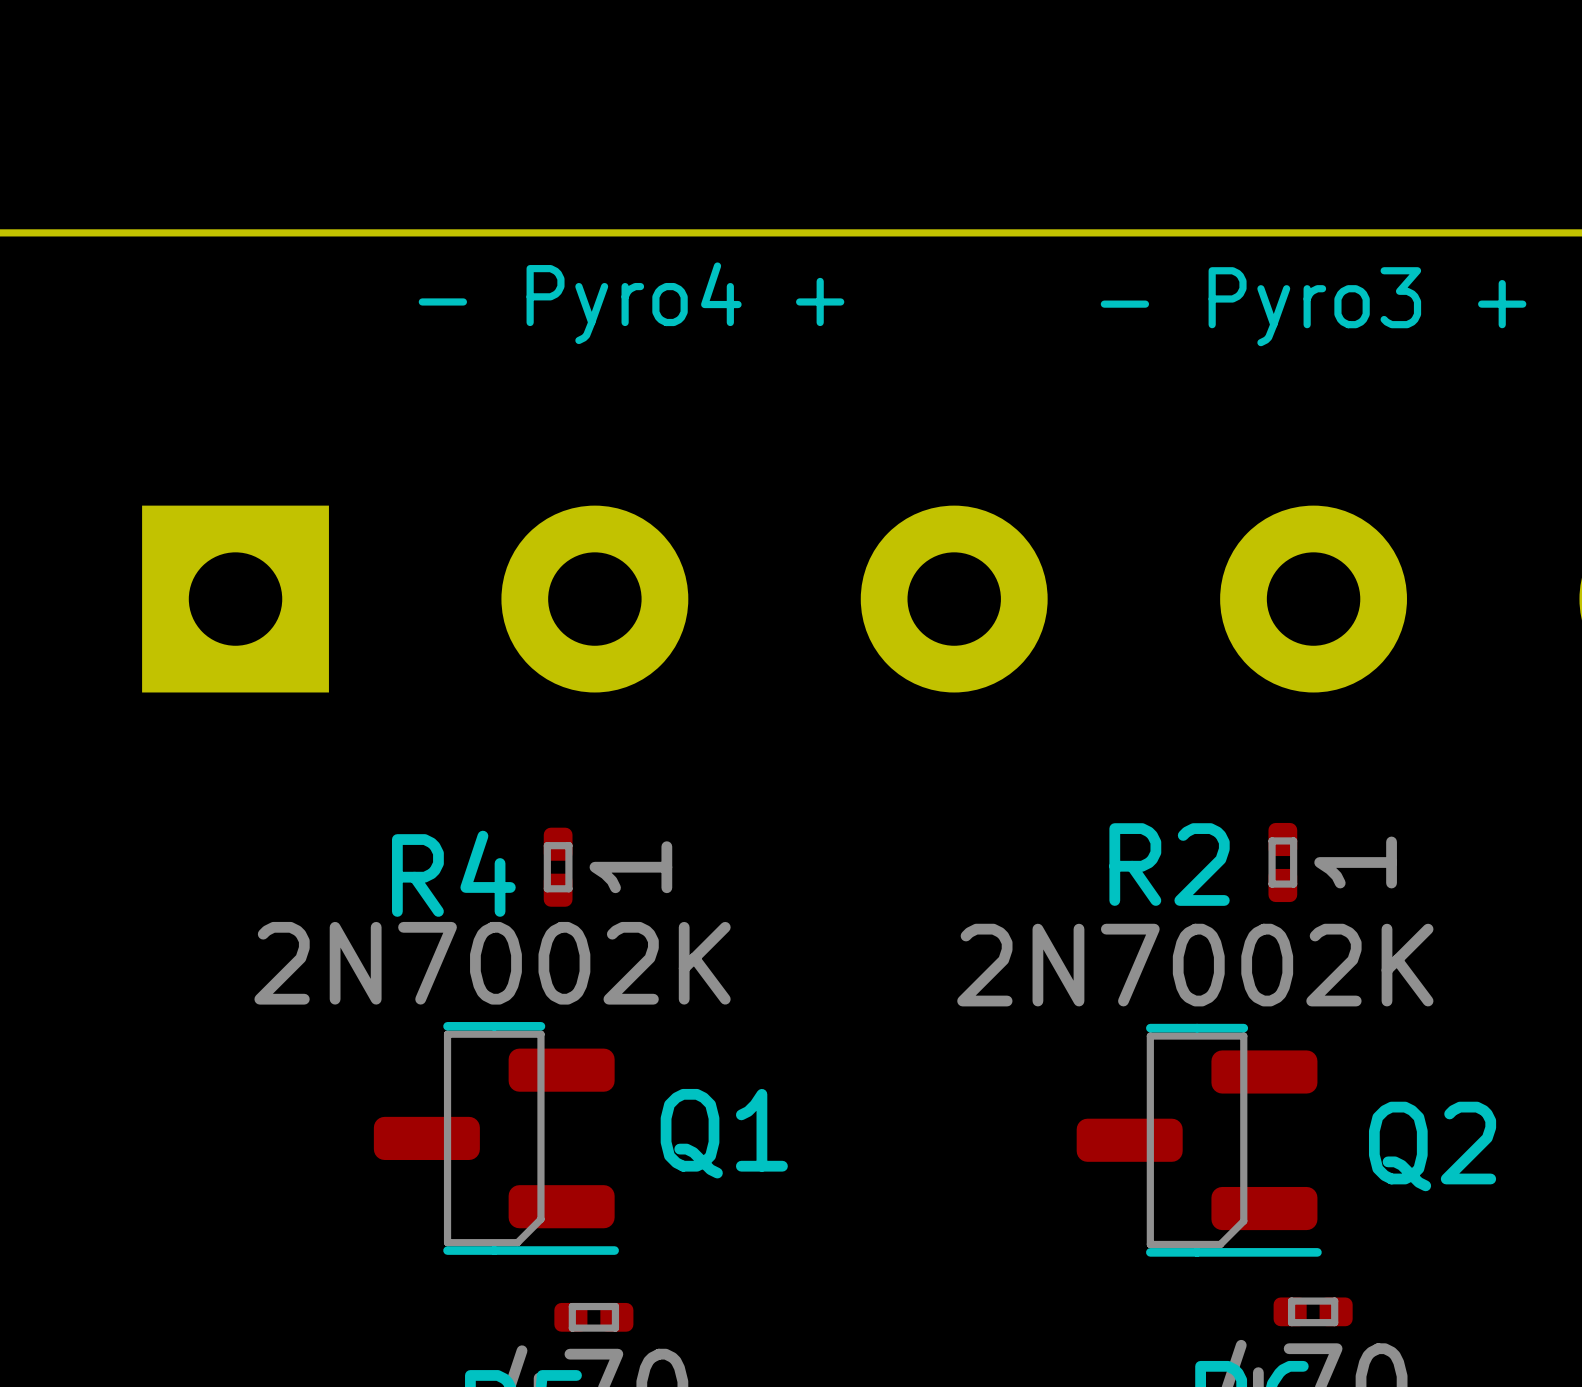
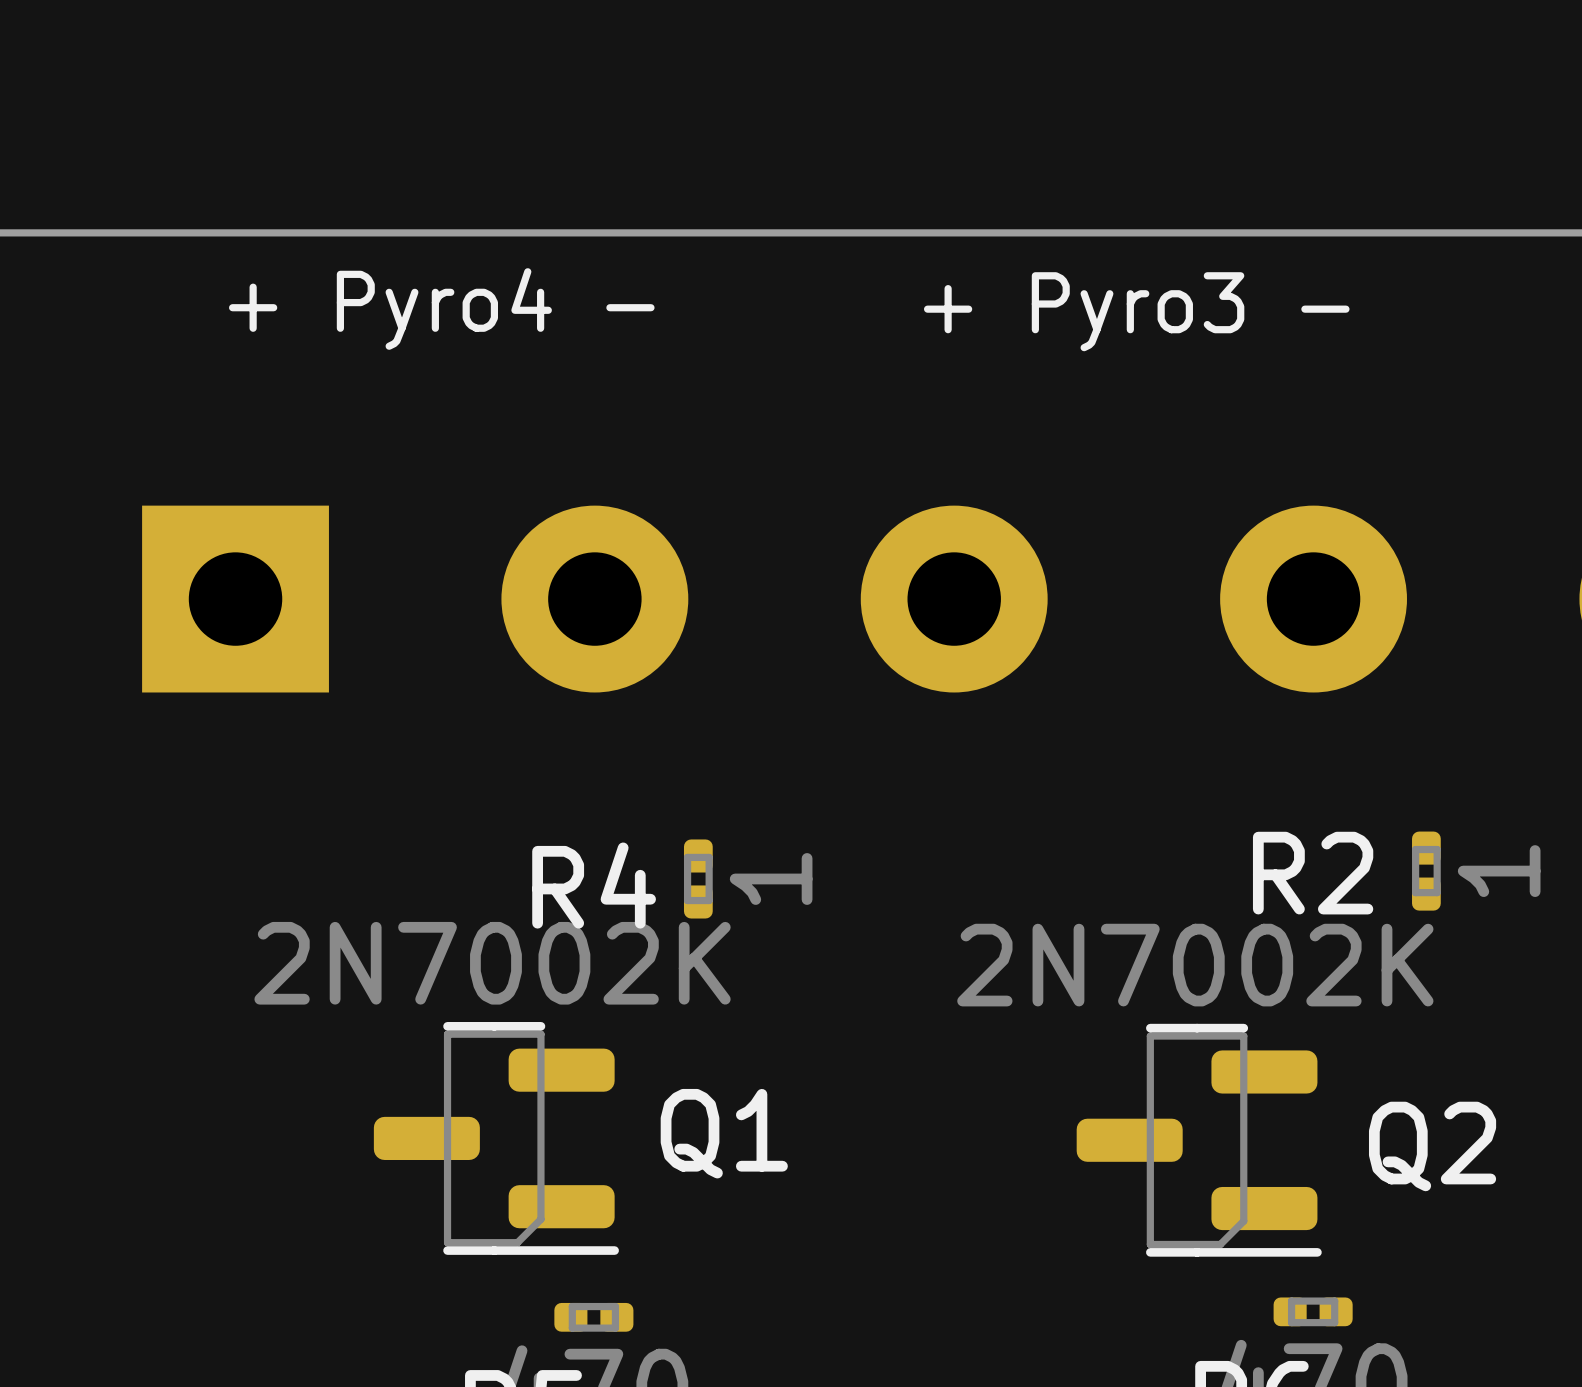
text: - Pyro4 + (631, 303) -> + Pyro4 - (441, 309)
text: - Pyro3 + (1313, 306) -> + Pyro3 - (1136, 311)
R2 position: (1282, 862) -> (1426, 871)
R4 position: (558, 867) -> (698, 878)

